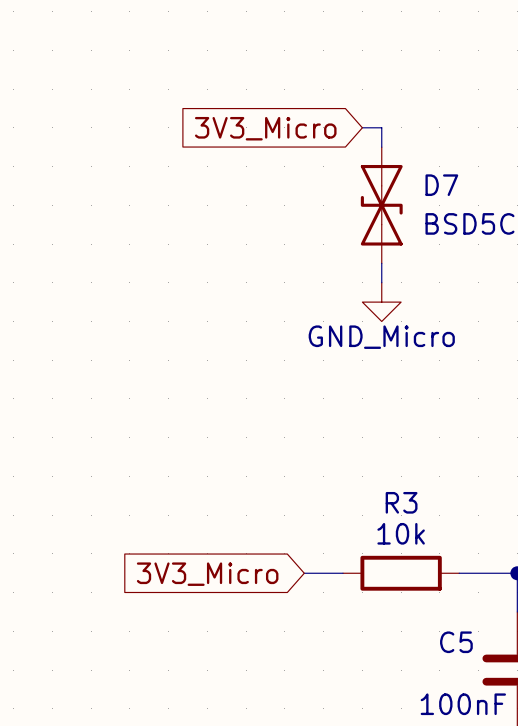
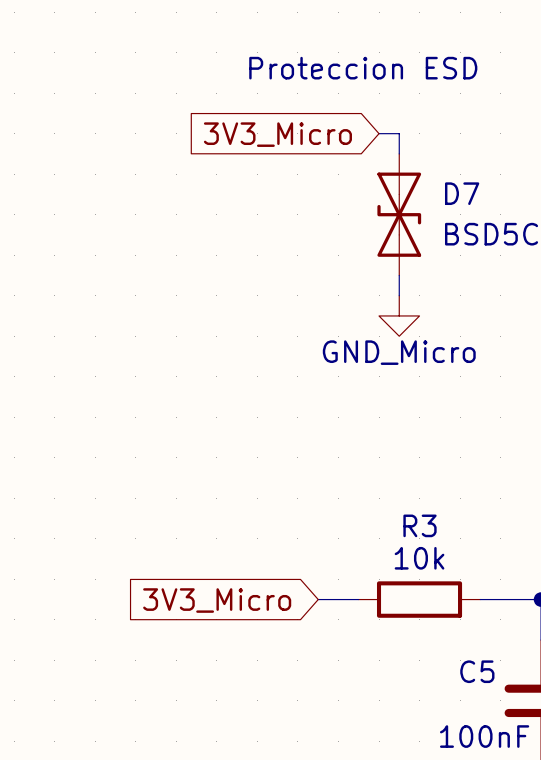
text: none -> Proteccion ESD (363, 68)

